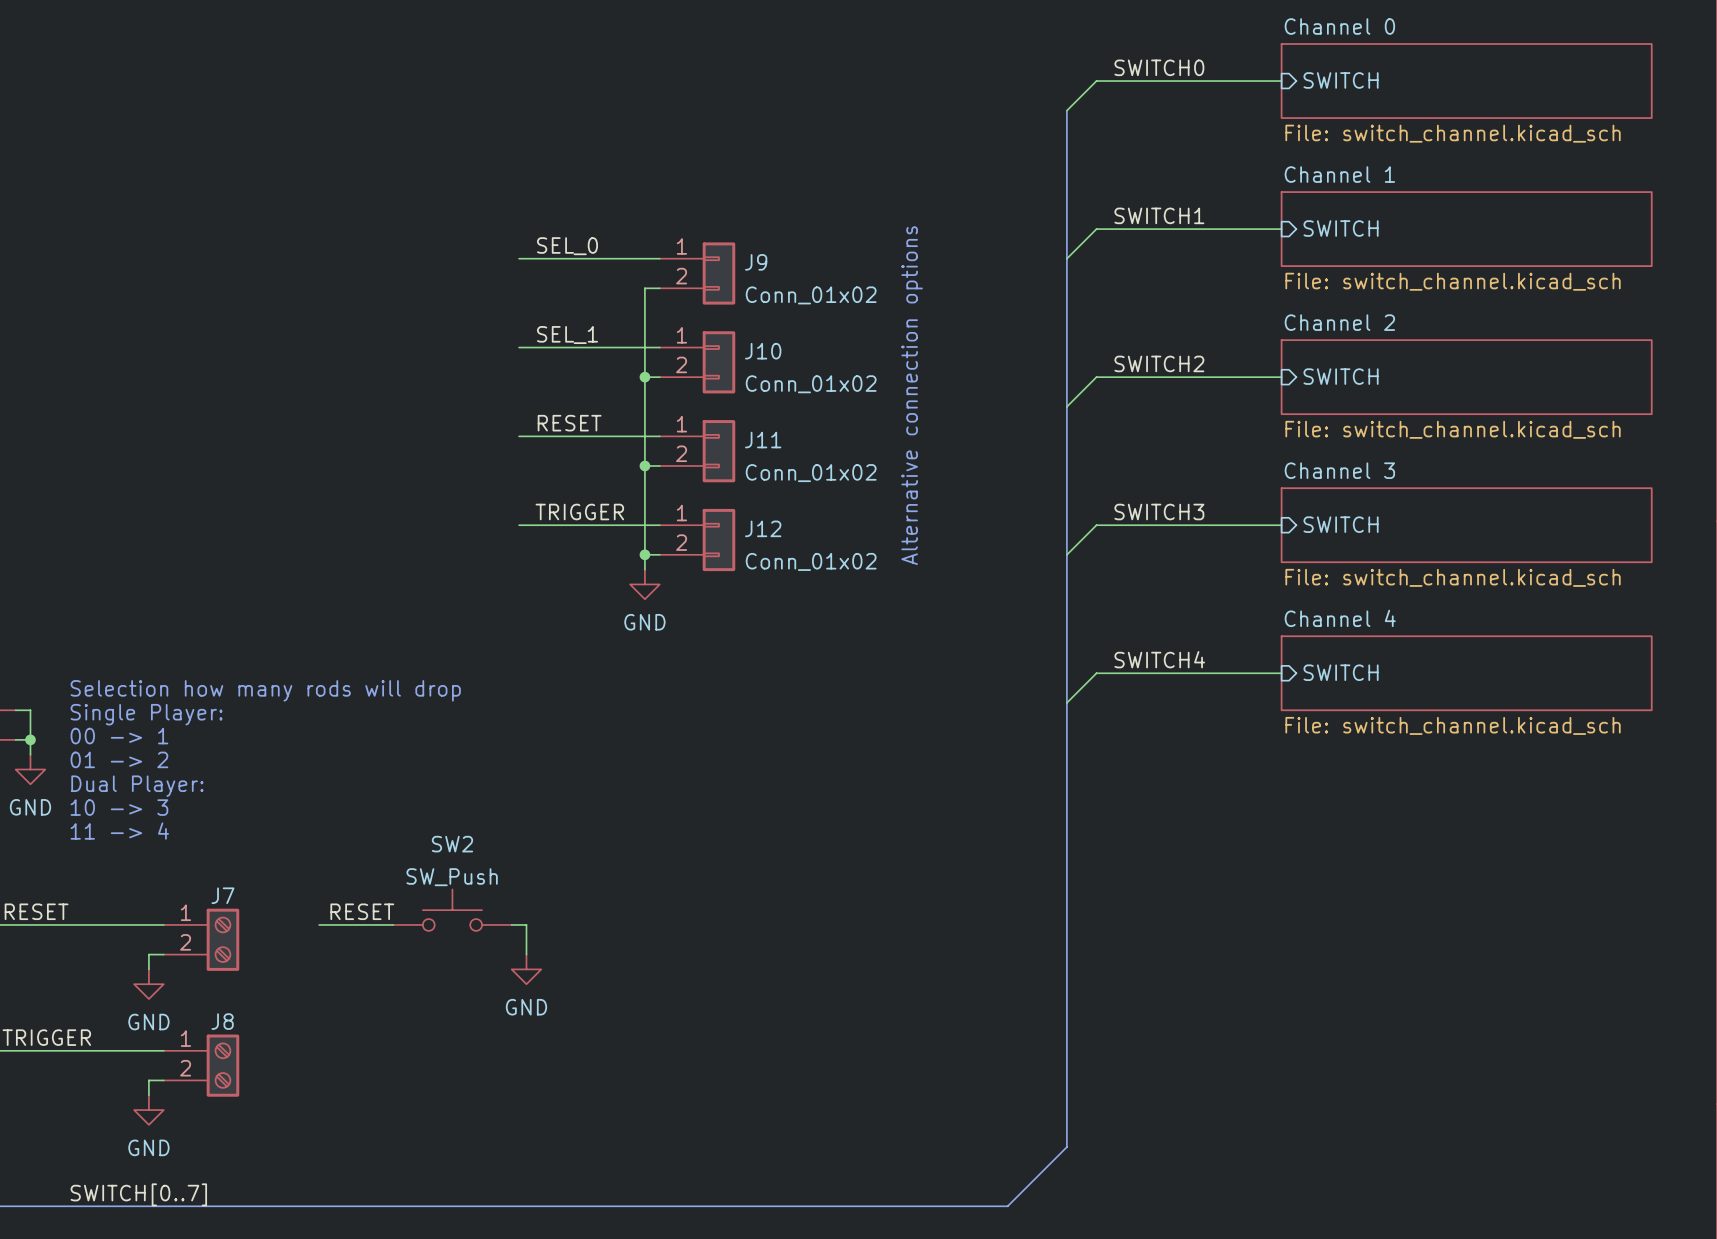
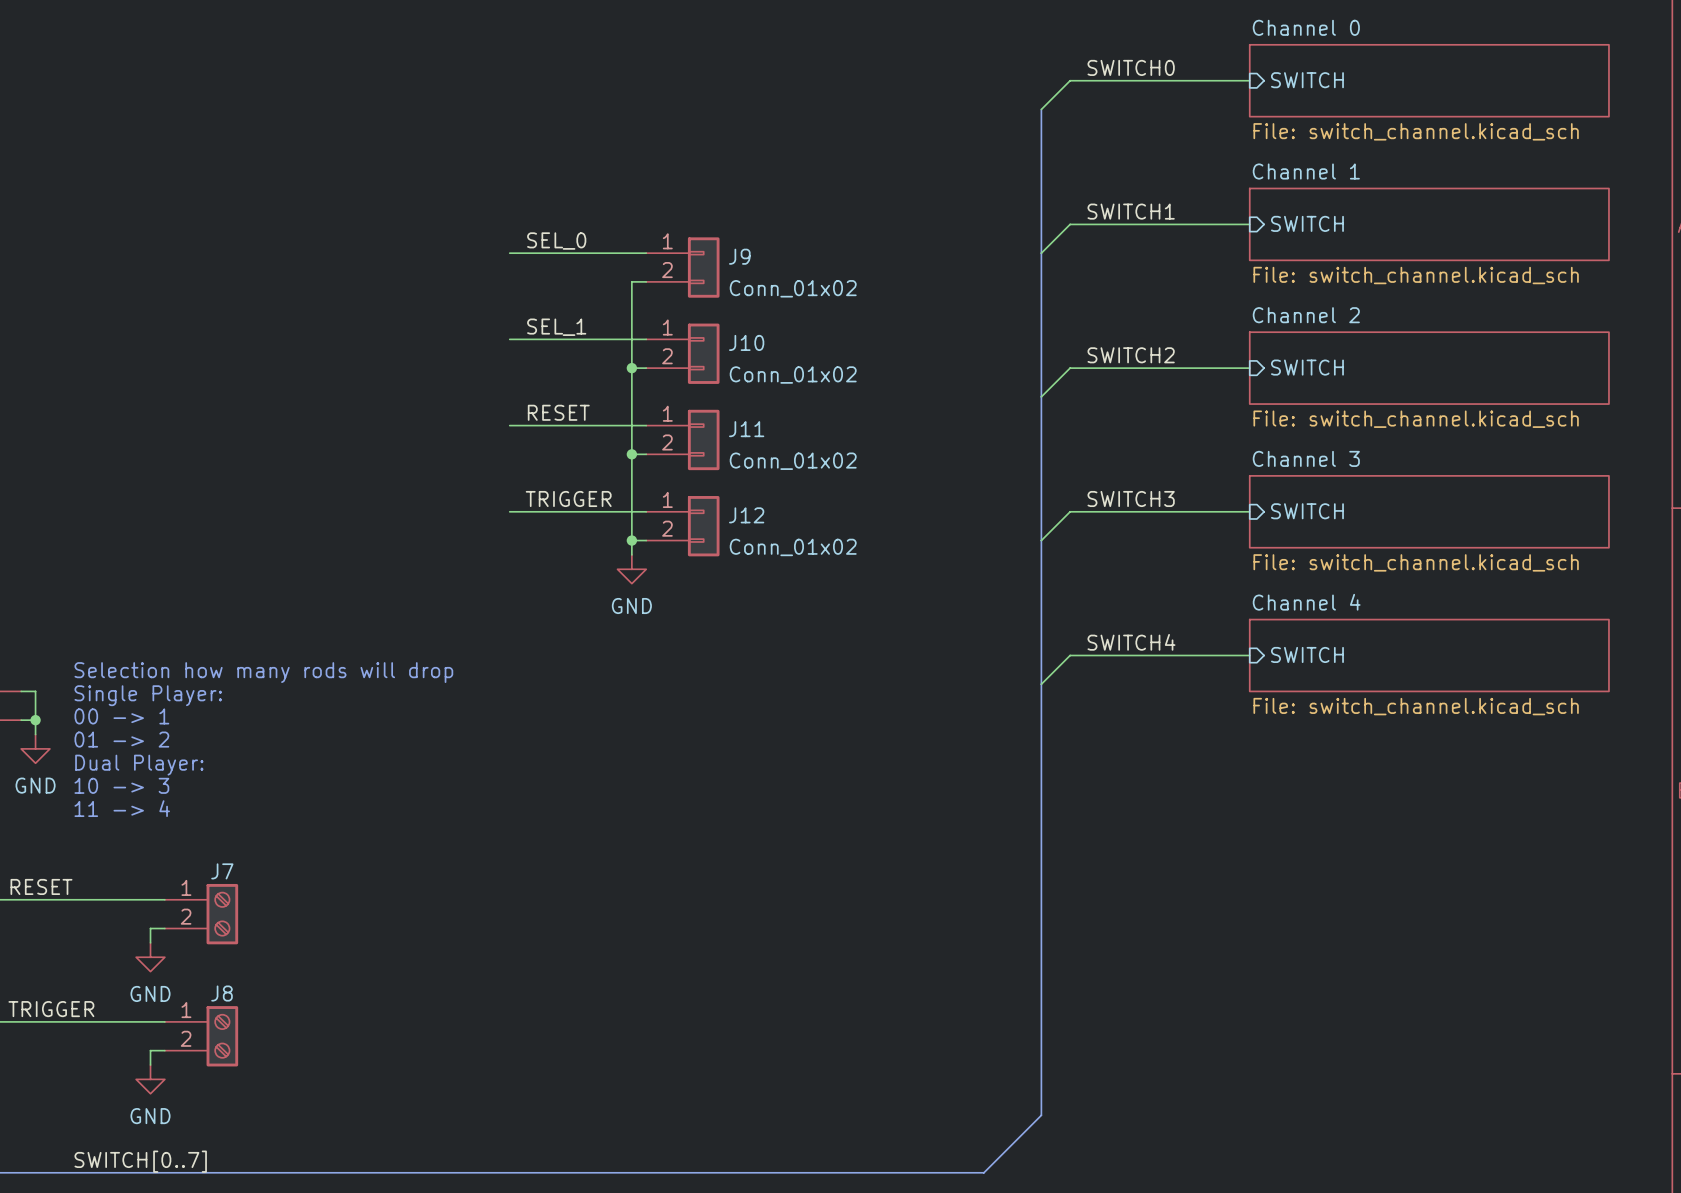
text: Alternative connection options (912, 395) -> none
SW2: SW_Push (452, 910) -> none
label: RESET (362, 911) -> none
wire: (319, 924) (393, 924) -> none
wire: (511, 924) (526, 924) (526, 954) -> none
power symbol: GND (526, 969) -> none

